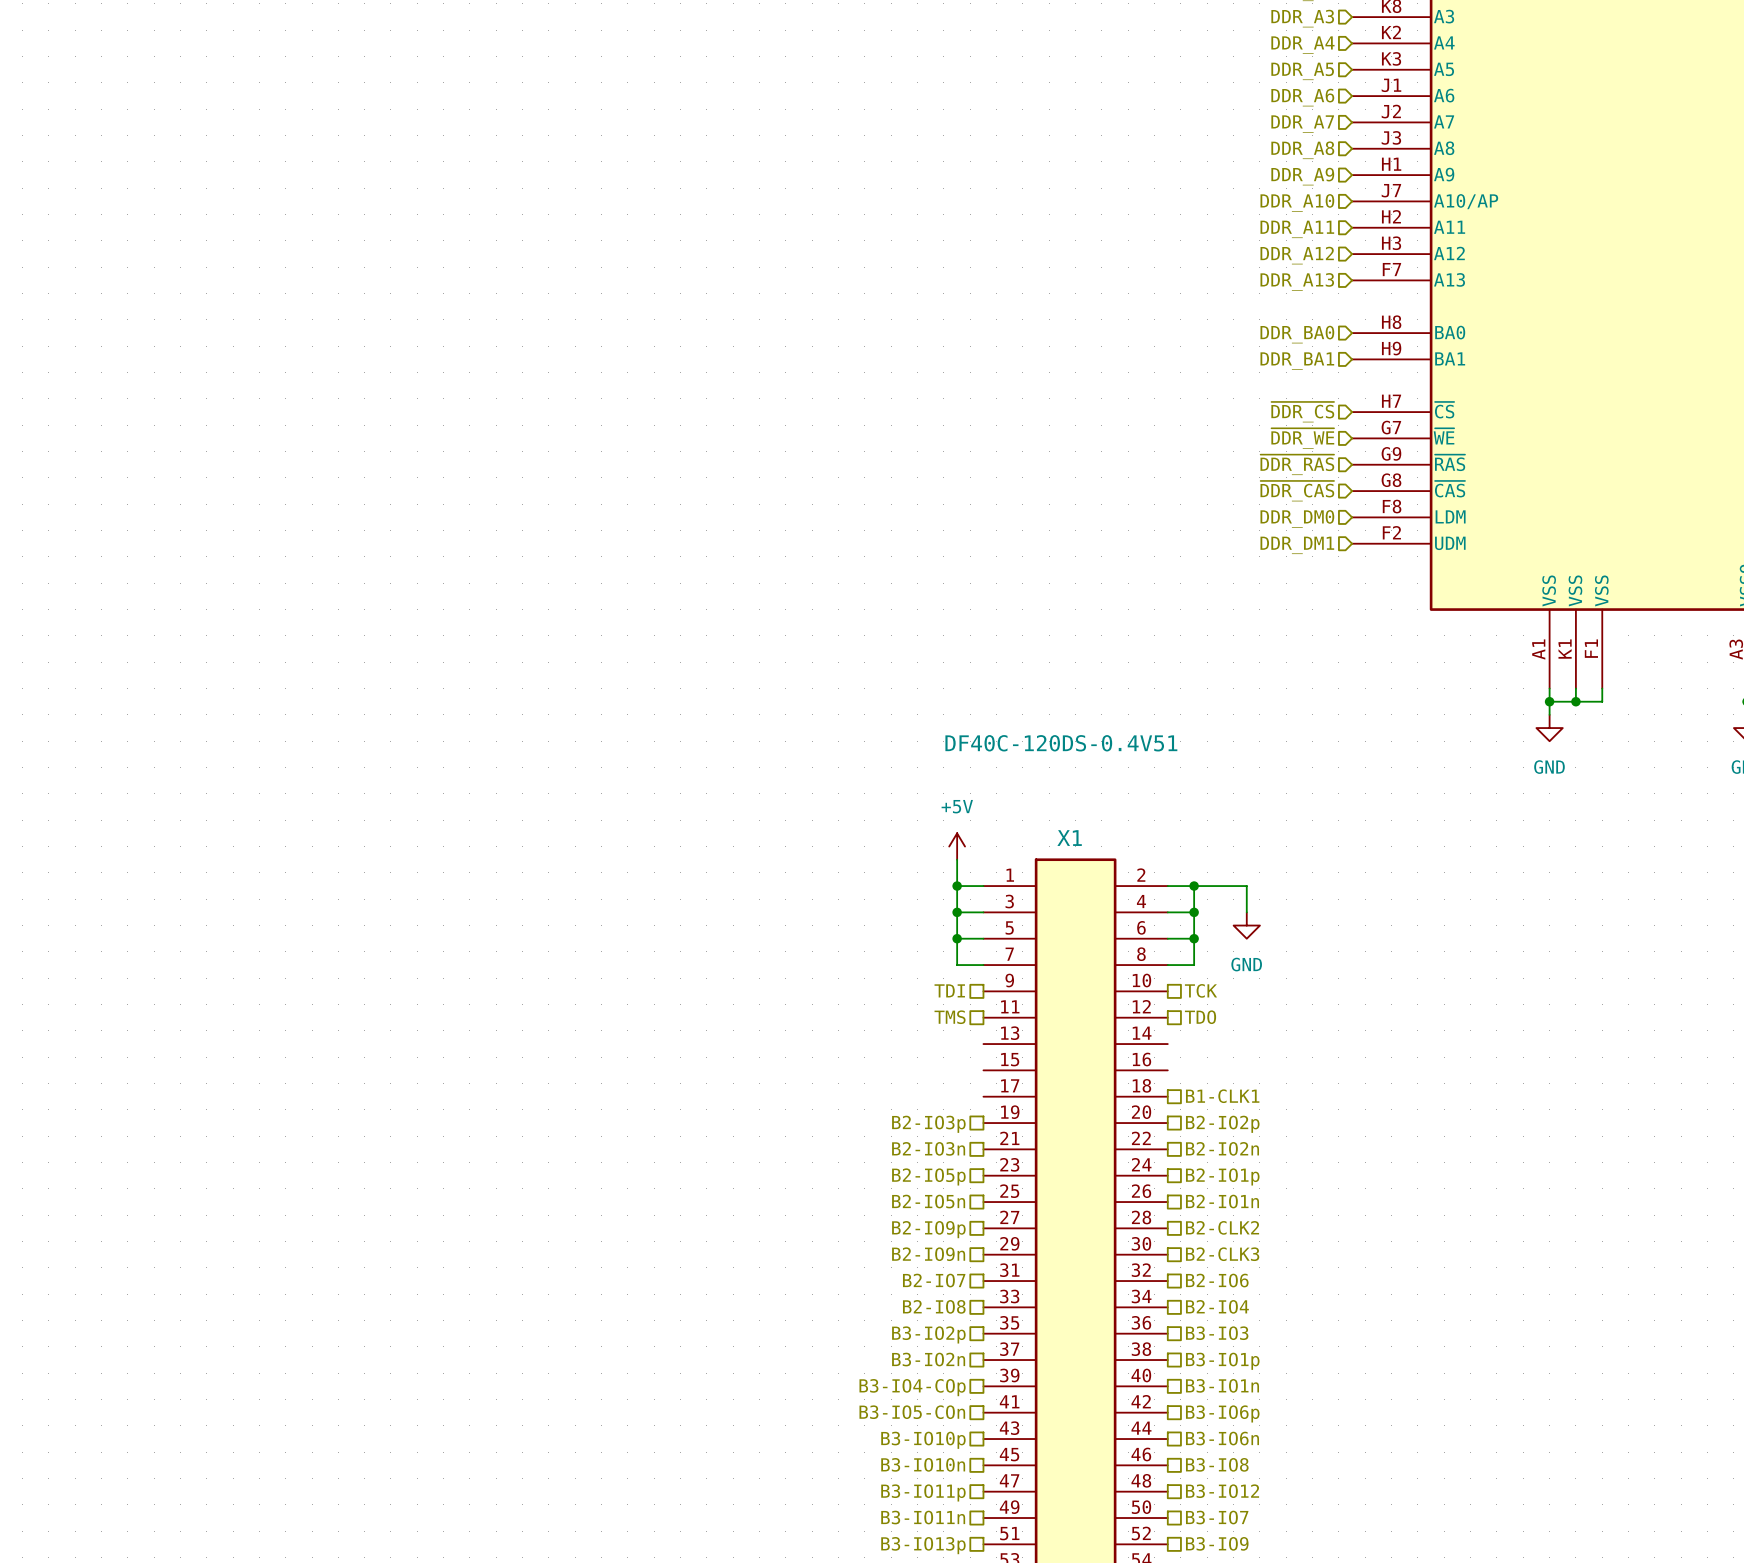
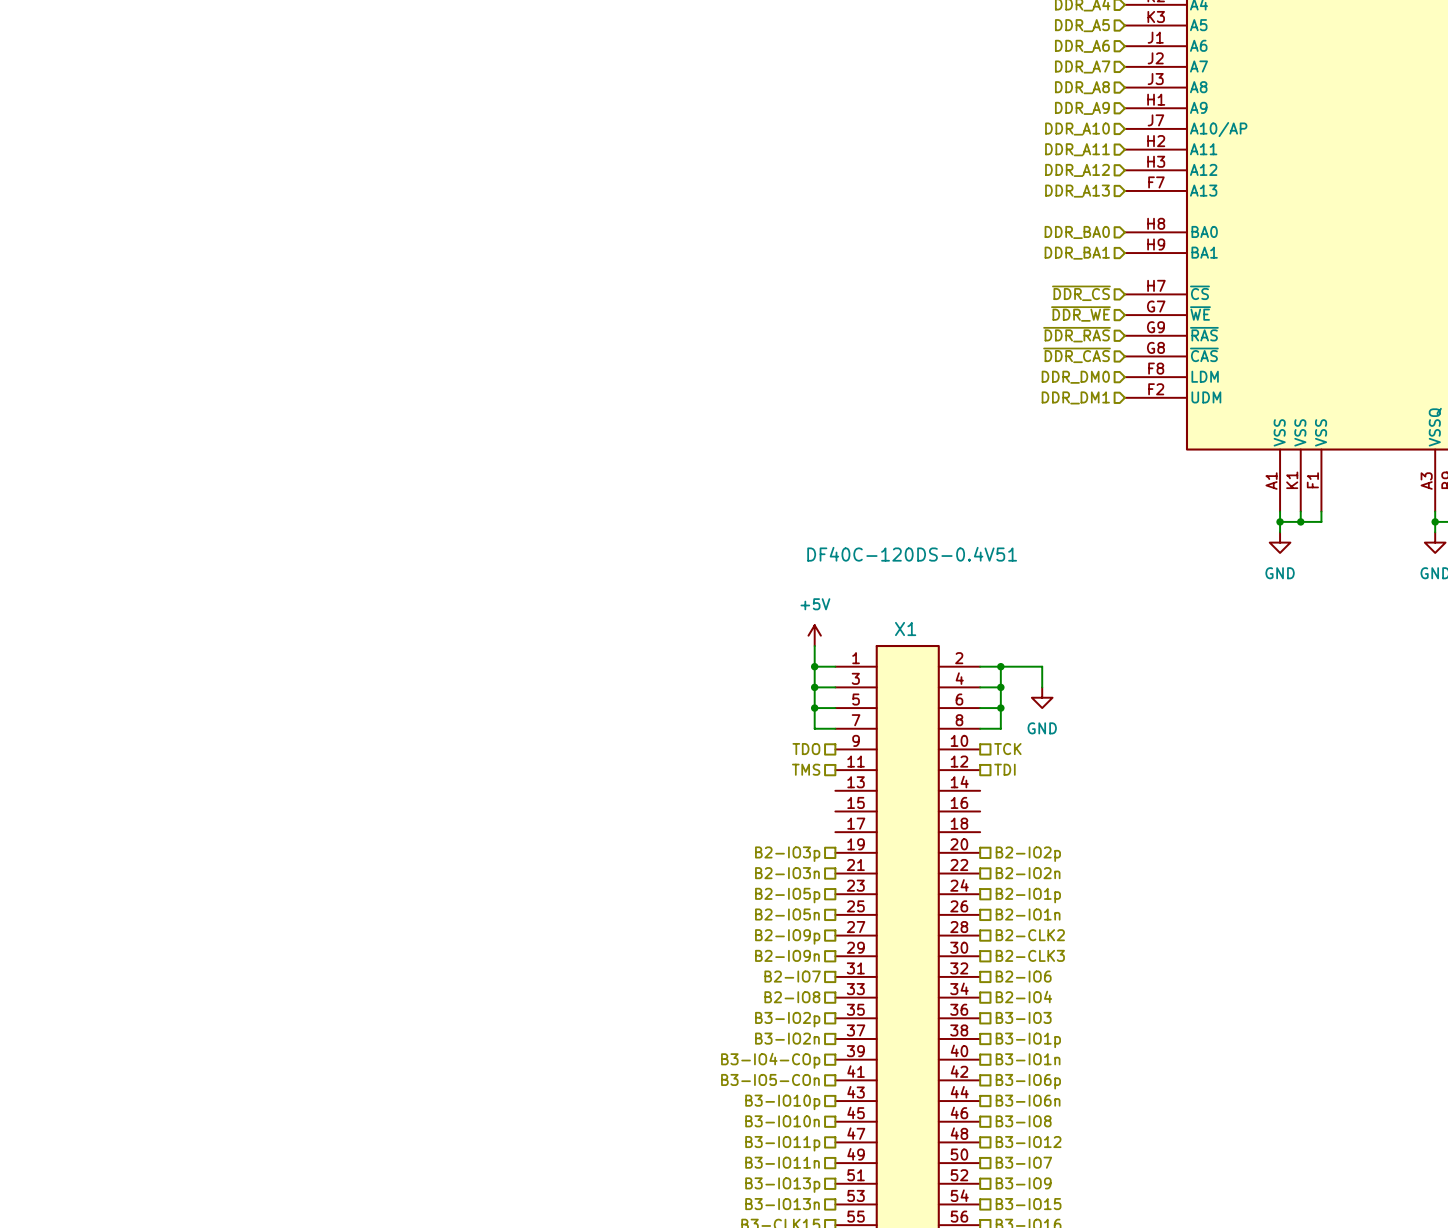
hierarchical label: TDI (949, 990) -> TDO (806, 749)
hierarchical label: TDO (1200, 1017) -> TDI (1004, 769)
hierarchical label: B1-CLK1 (1222, 1096) -> none

